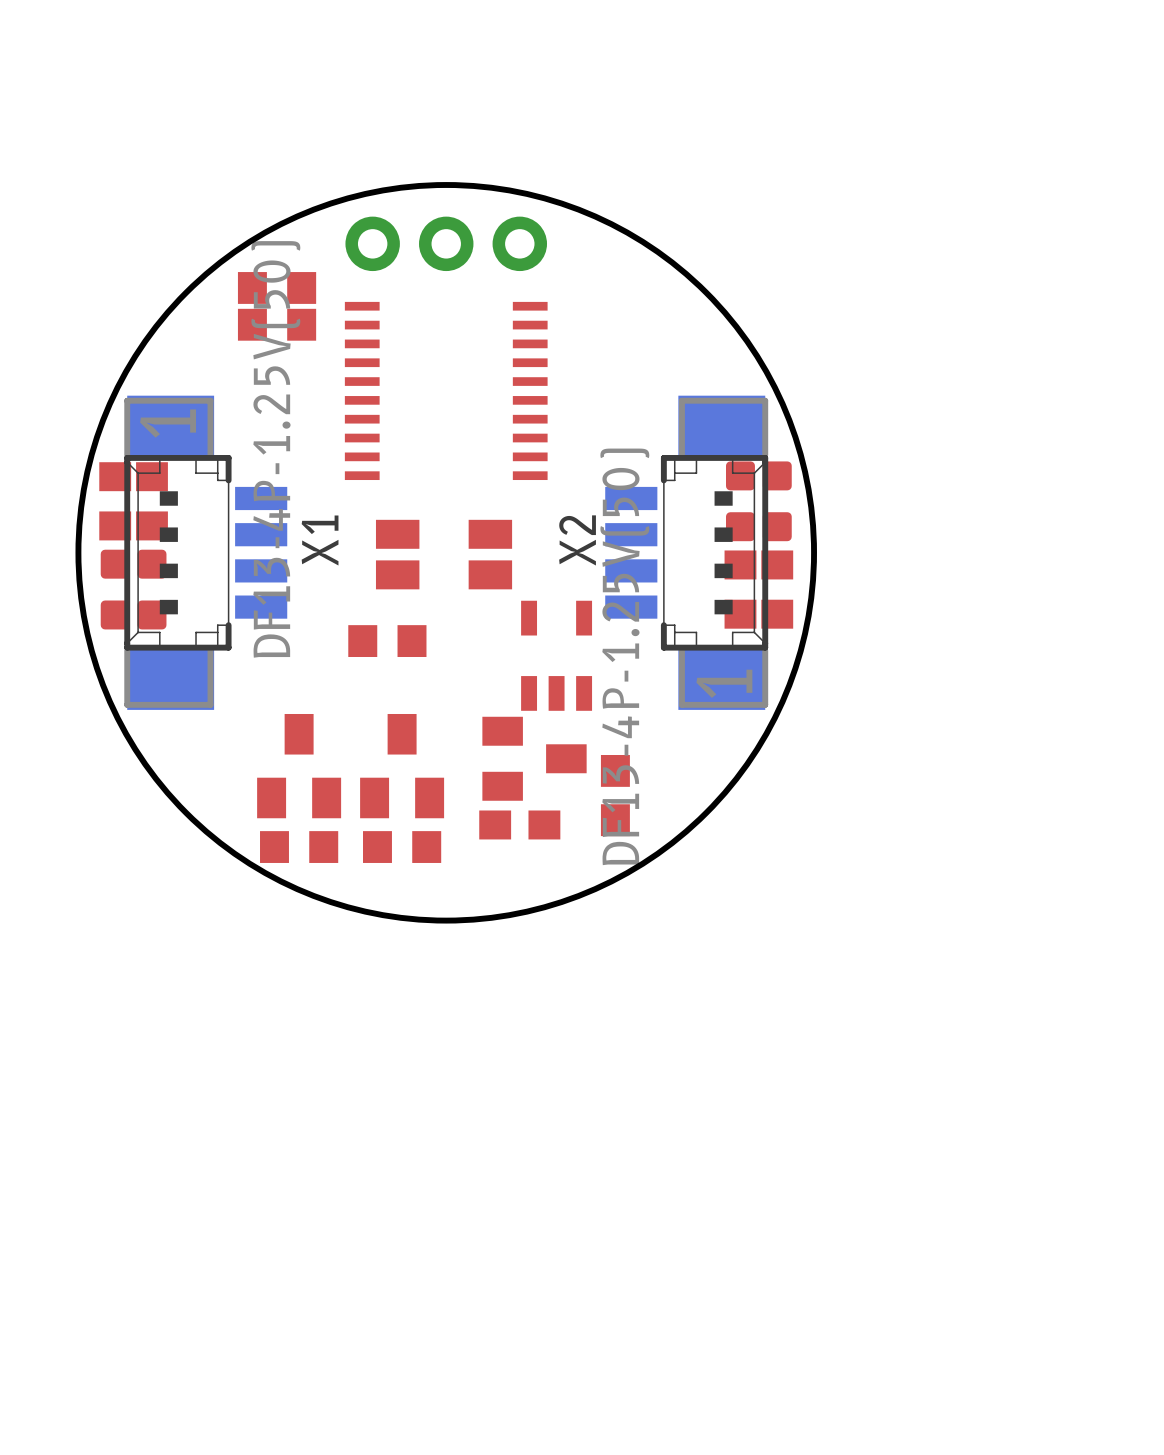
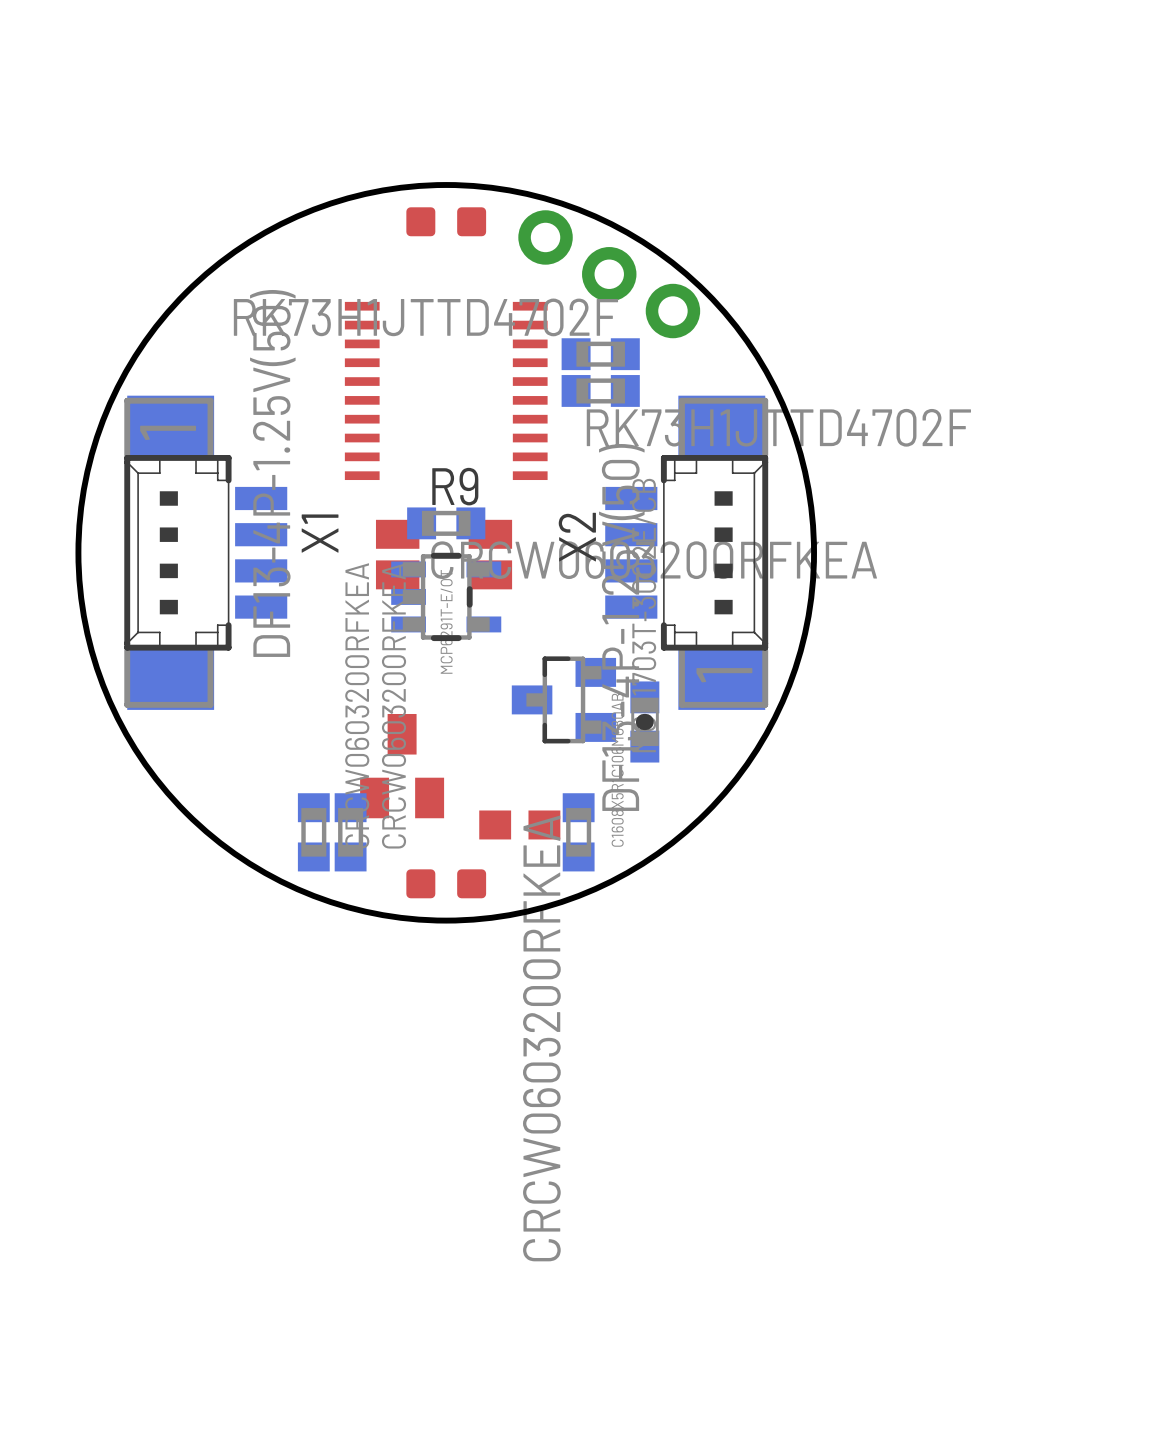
part footprint: [345, 216, 548, 272] -> [406, 207, 487, 237]
part: none -> (609, 274)
part side: top (277, 287) -> bottom (600, 354)
part side: top (277, 324) -> bottom (600, 390)
part: (115, 501) -> none
part: (151, 501) -> none
part: (740, 501) -> none
part: (777, 501) -> none
part: (115, 589) -> none
part: (151, 589) -> none
part side: top (740, 589) -> bottom (578, 832)
part side: top (777, 589) -> bottom (350, 832)
R9 side: top (387, 641) -> bottom (446, 523)
part side: top (556, 655) -> bottom (446, 596)
part side: top (534, 758) -> bottom (563, 699)
part: (299, 766) -> none
part side: top (615, 795) -> bottom (644, 721)
part side: top (299, 847) -> bottom (313, 832)
part: (402, 847) -> none
part: none -> (446, 883)

